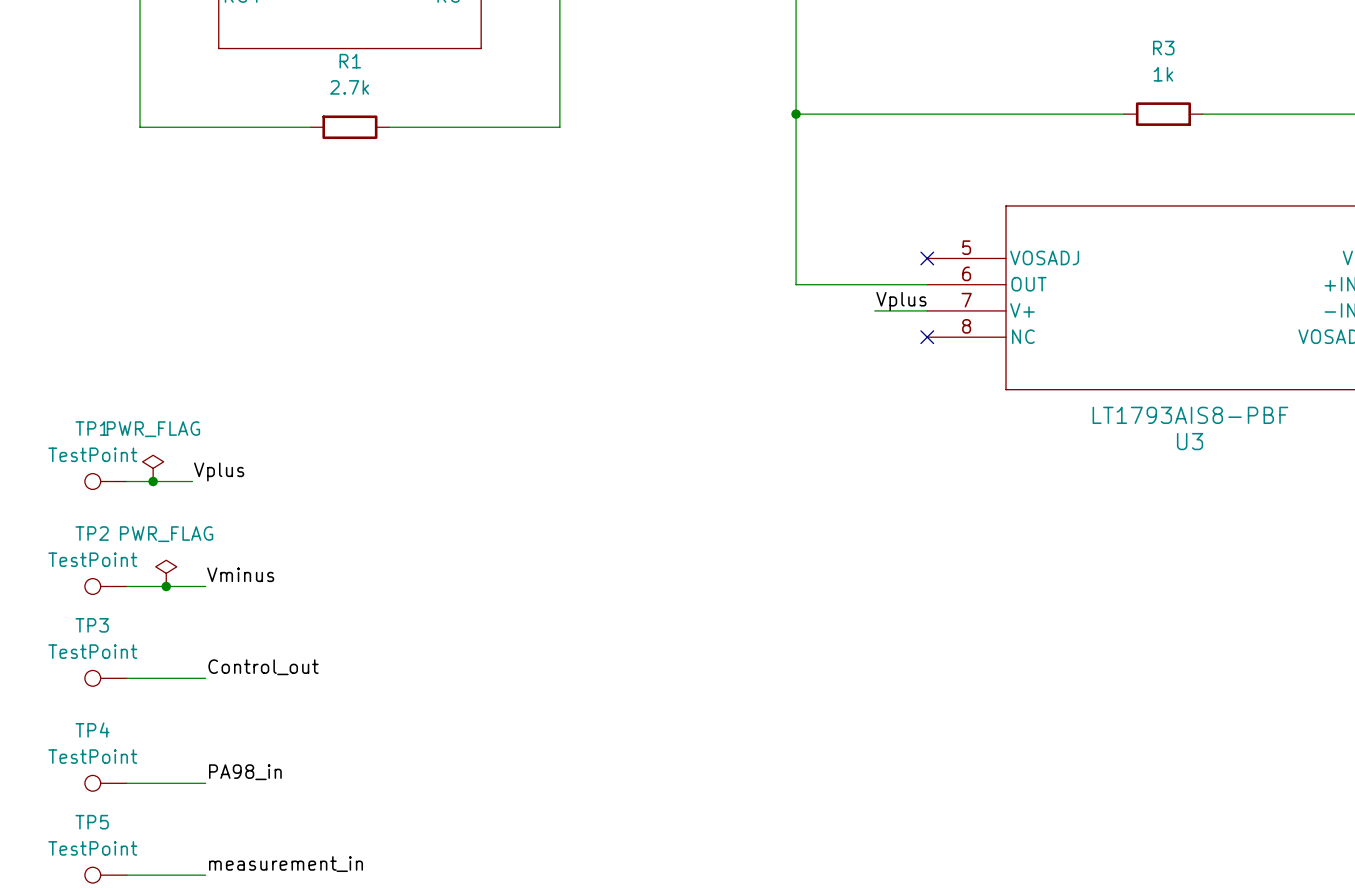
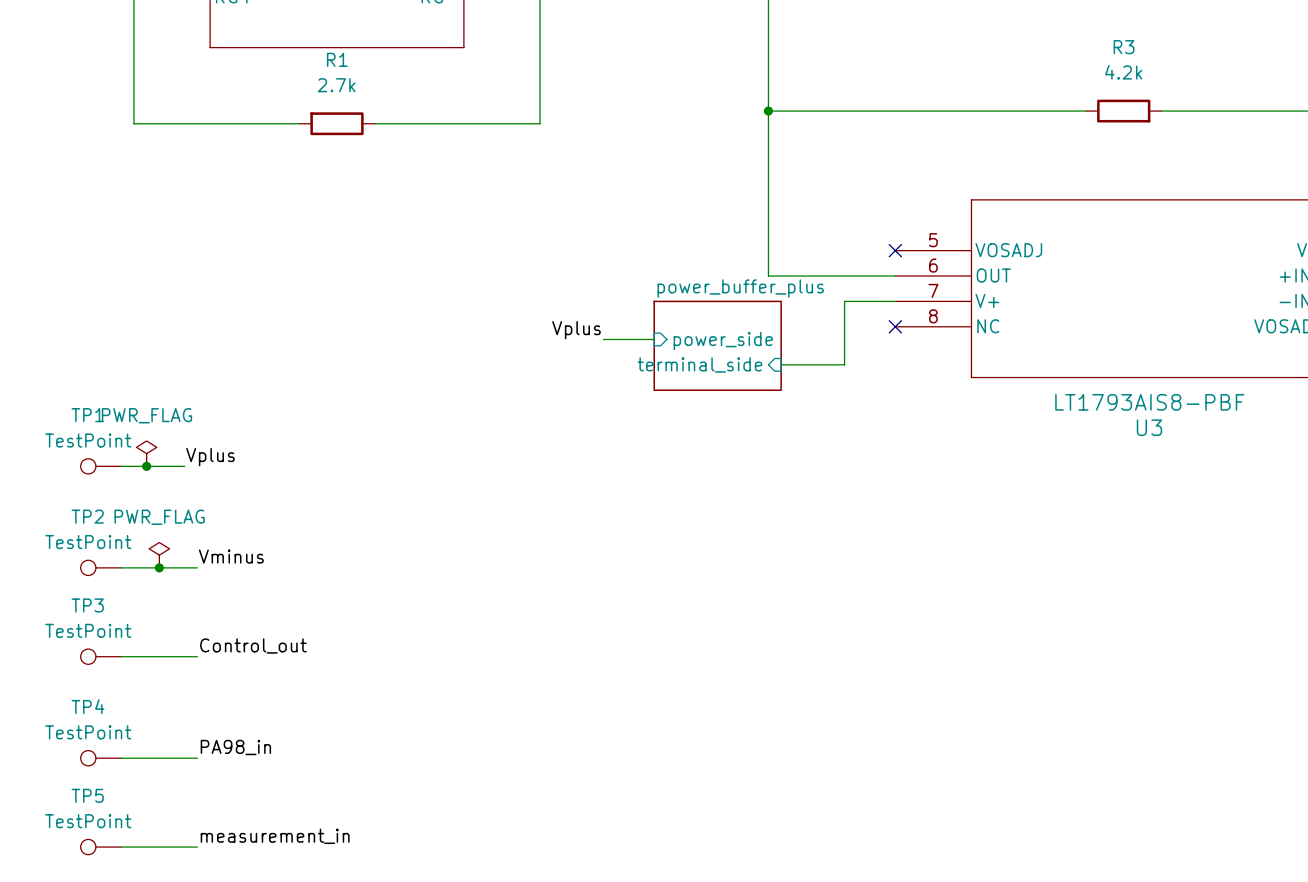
R3 value: 1k (1163, 74) -> 4.2k (1123, 72)
label position: Vplus (901, 301) -> Vplus (576, 330)
wire: none -> (844, 301) (844, 364) (781, 364)
wire: none -> (603, 339) (654, 339)
sheet pin: none -> power_side (723, 341)
sheet power_buffer_plus: none -> (717, 345)
sheet pin: none -> terminal_side (699, 364)

